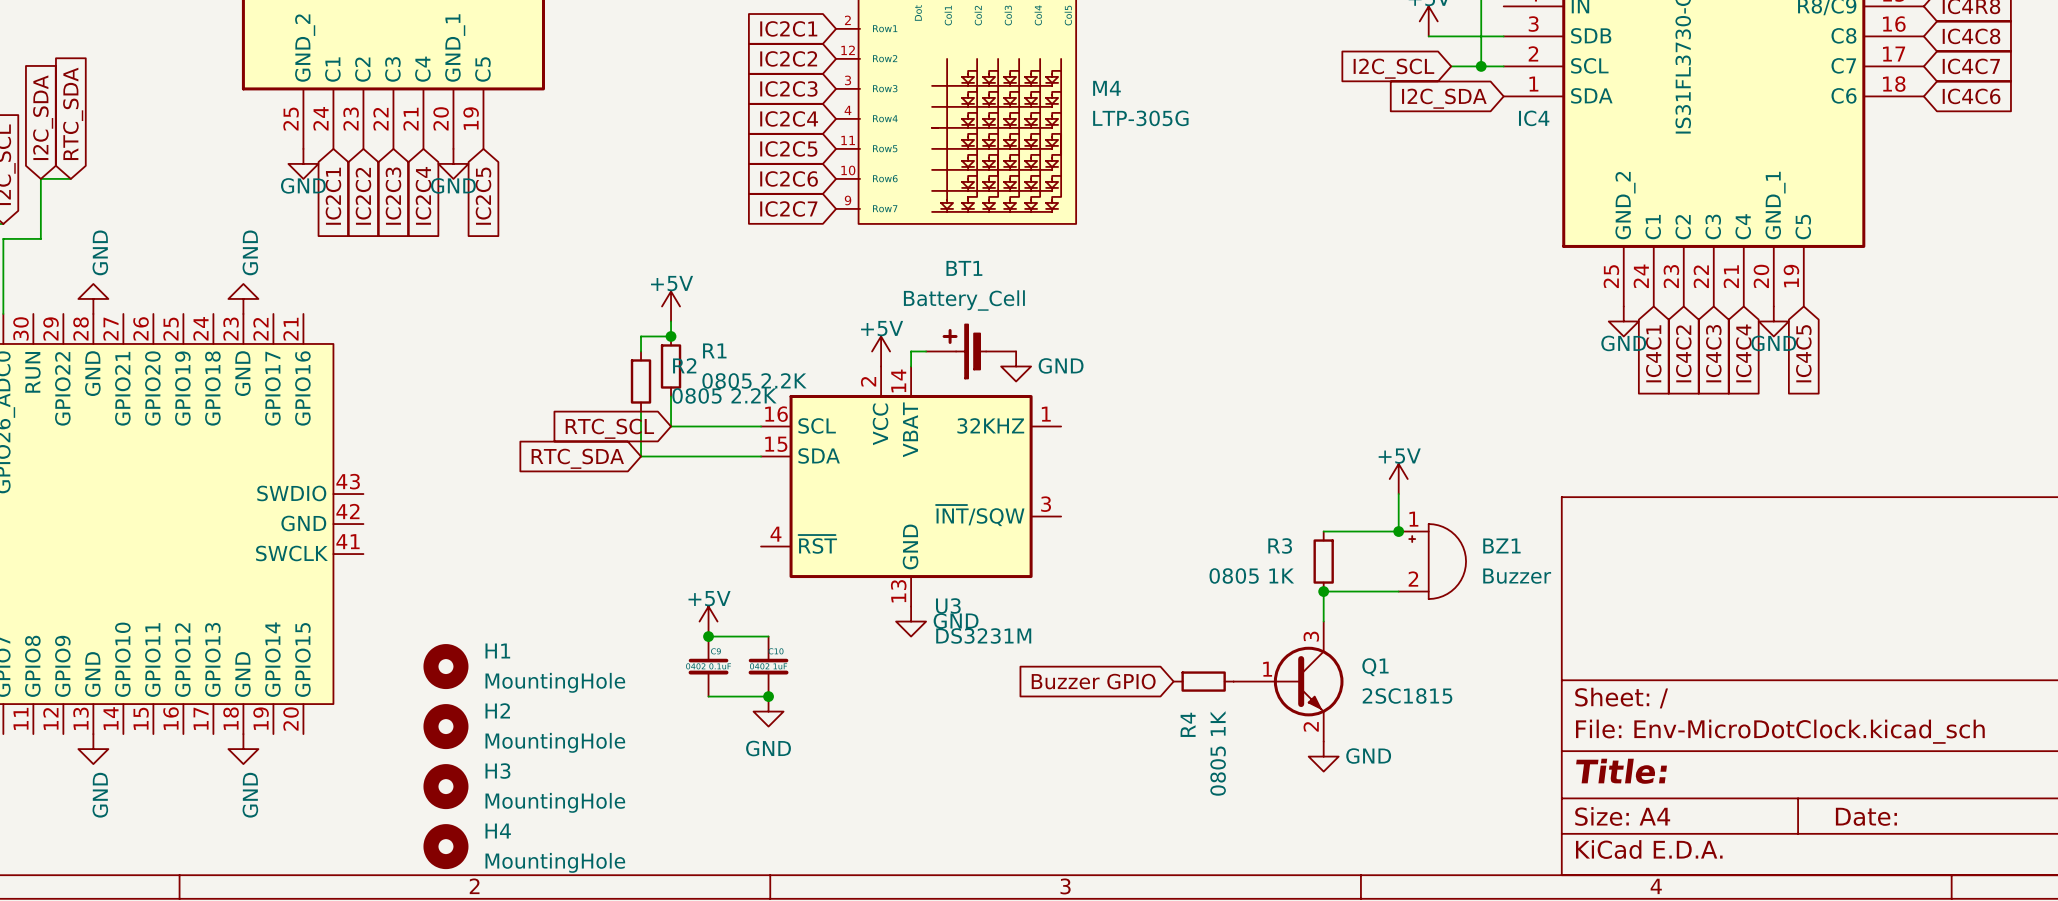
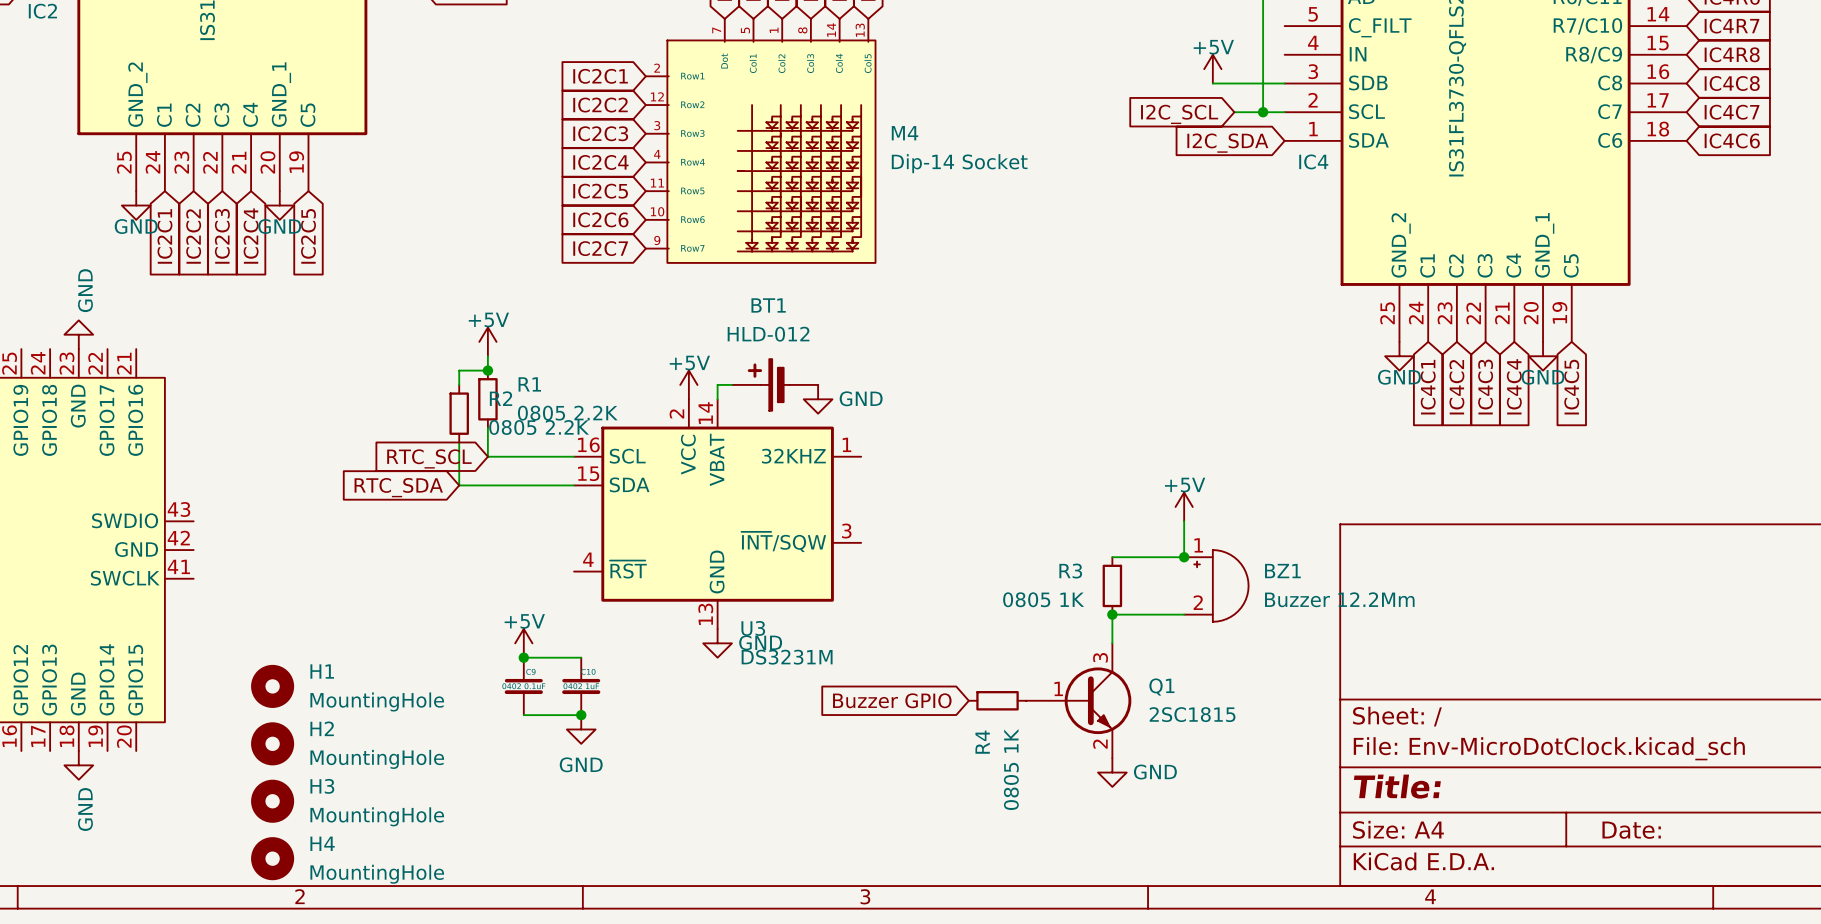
M4 value: LTP-305G (1140, 118) -> Dip-14 Socket (959, 163)
BT1 value: Battery_Cell (964, 300) -> HLD-012 (768, 334)
BZ1 value: Buzzer (1517, 576) -> Buzzer 12.2Mm (1339, 599)

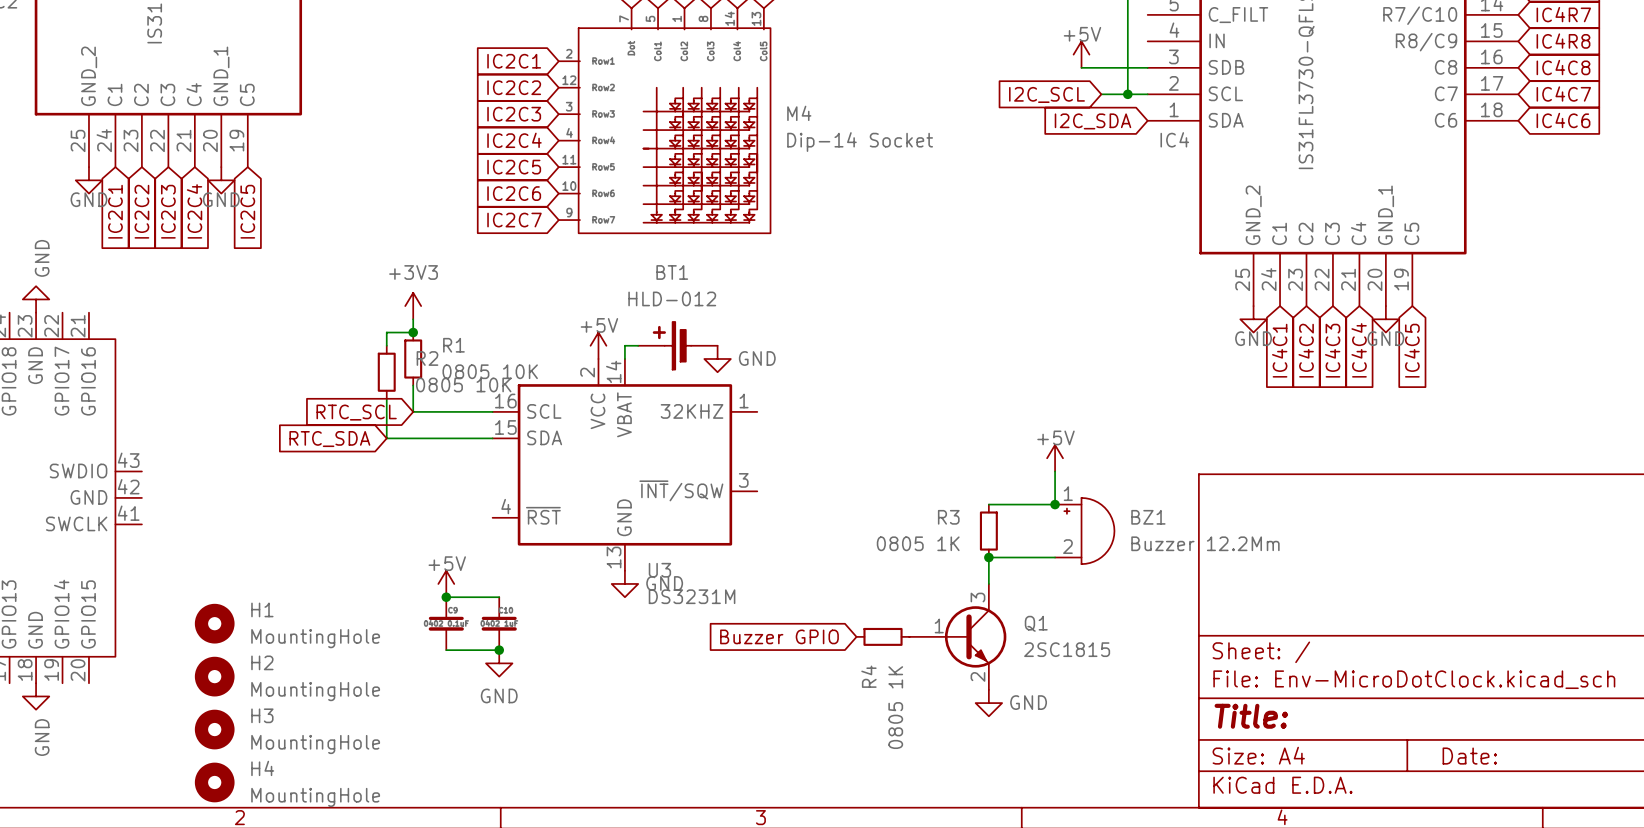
power symbol: +5V (487, 341) -> +3V3 (413, 306)
R1 value: 0805 2.2K (567, 413) -> 0805 10K (490, 371)
R2 value: 0805 2.2K (539, 427) -> 0805 10K (463, 384)

